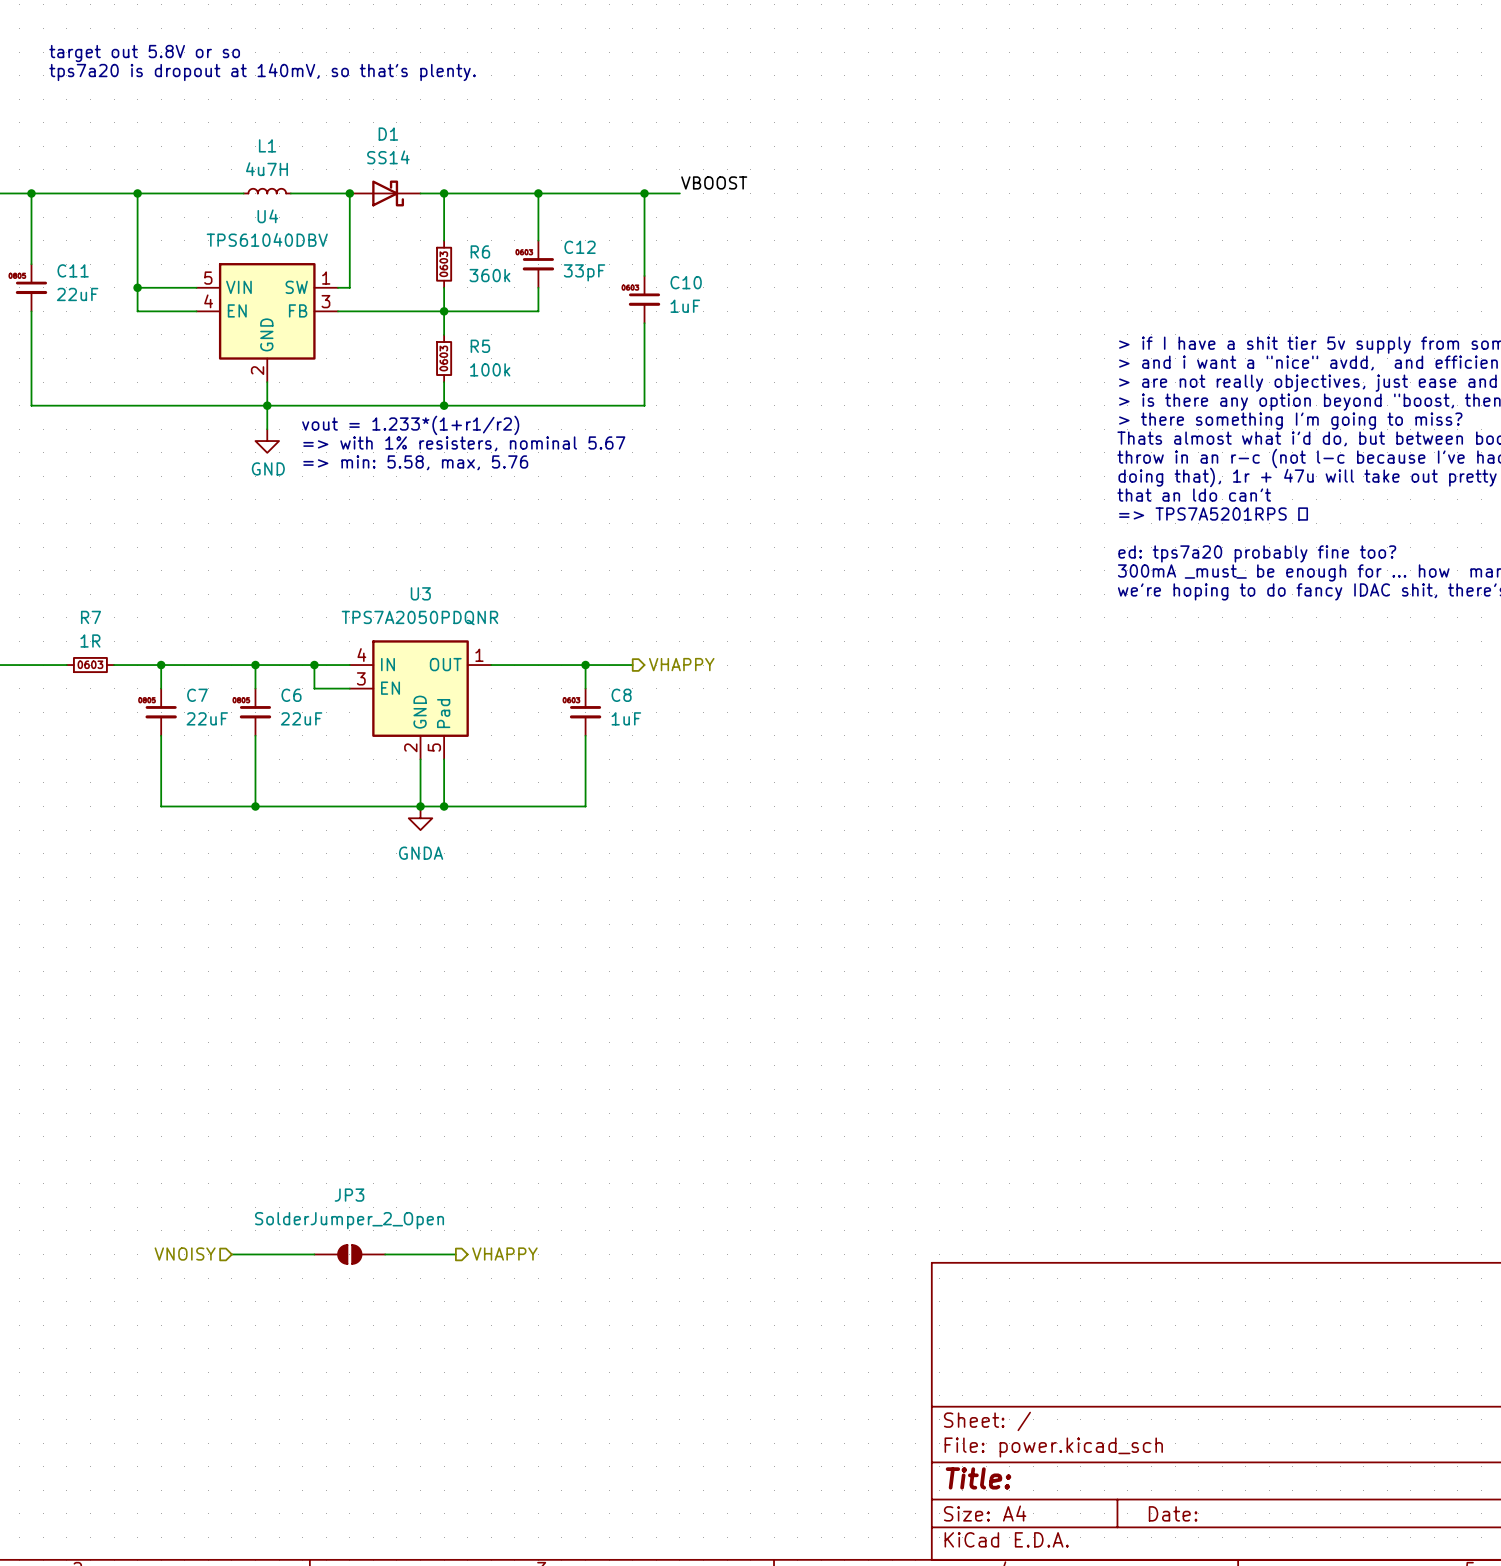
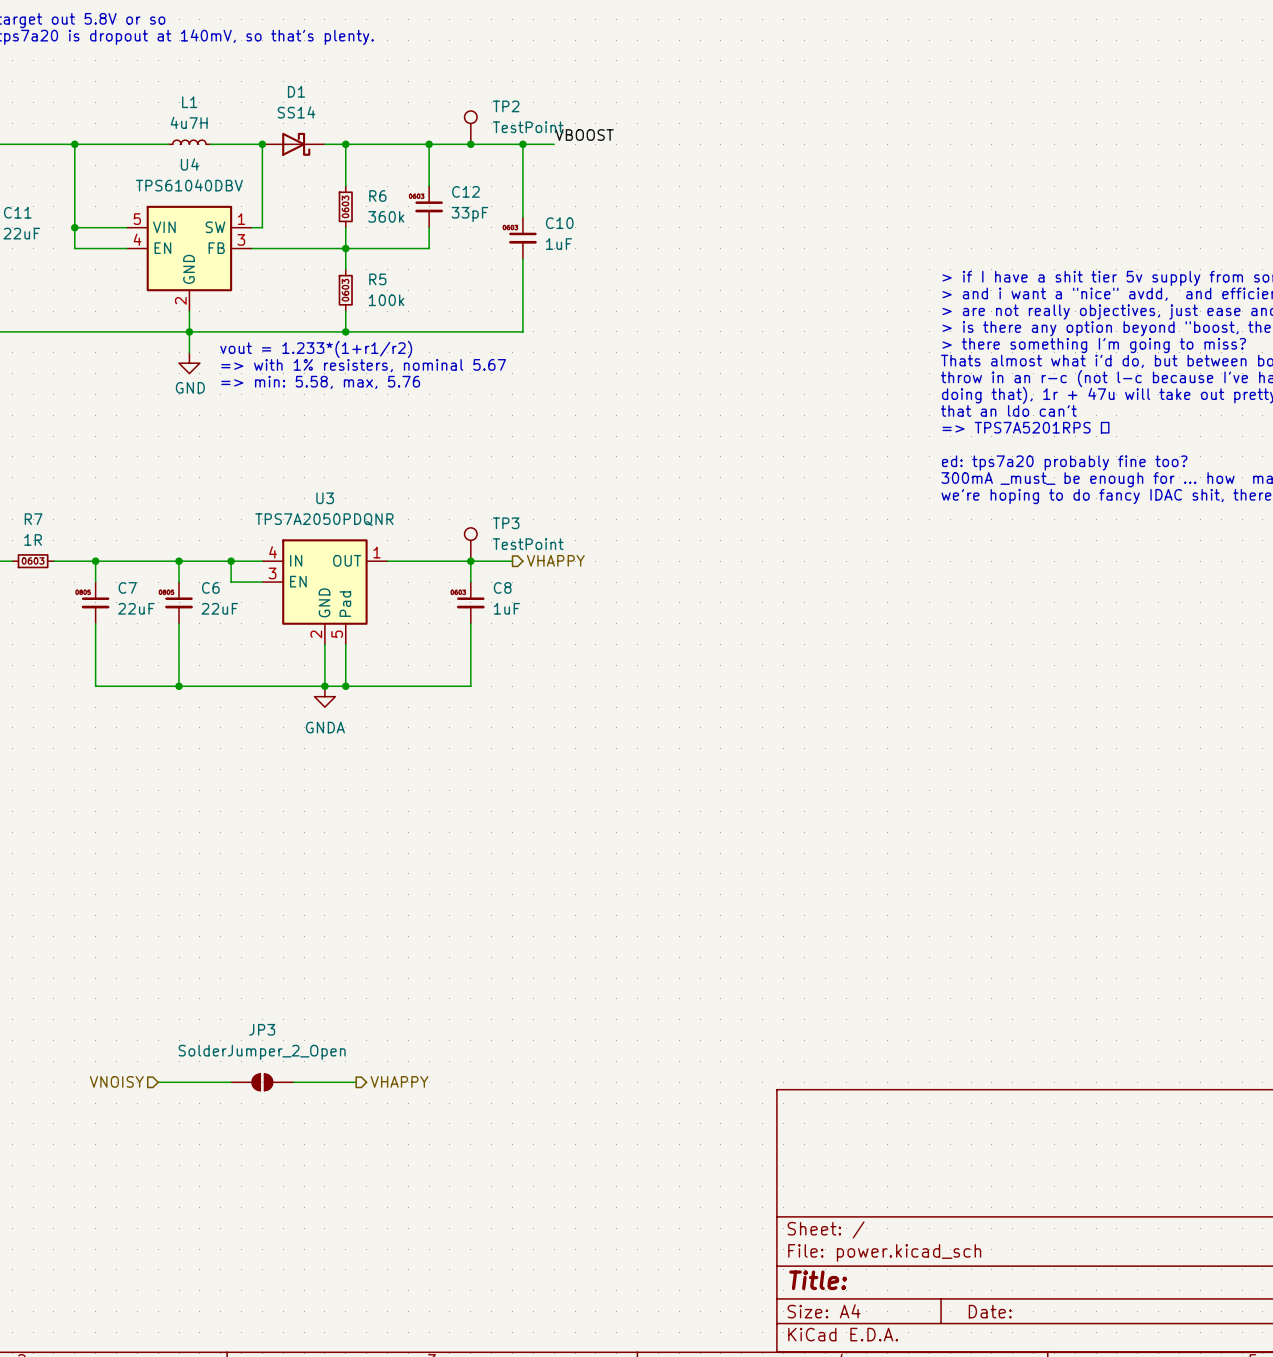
TP2: none -> TestPoint (470, 127)
junction: none -> (470, 144)
TP3: none -> TestPoint (470, 544)

